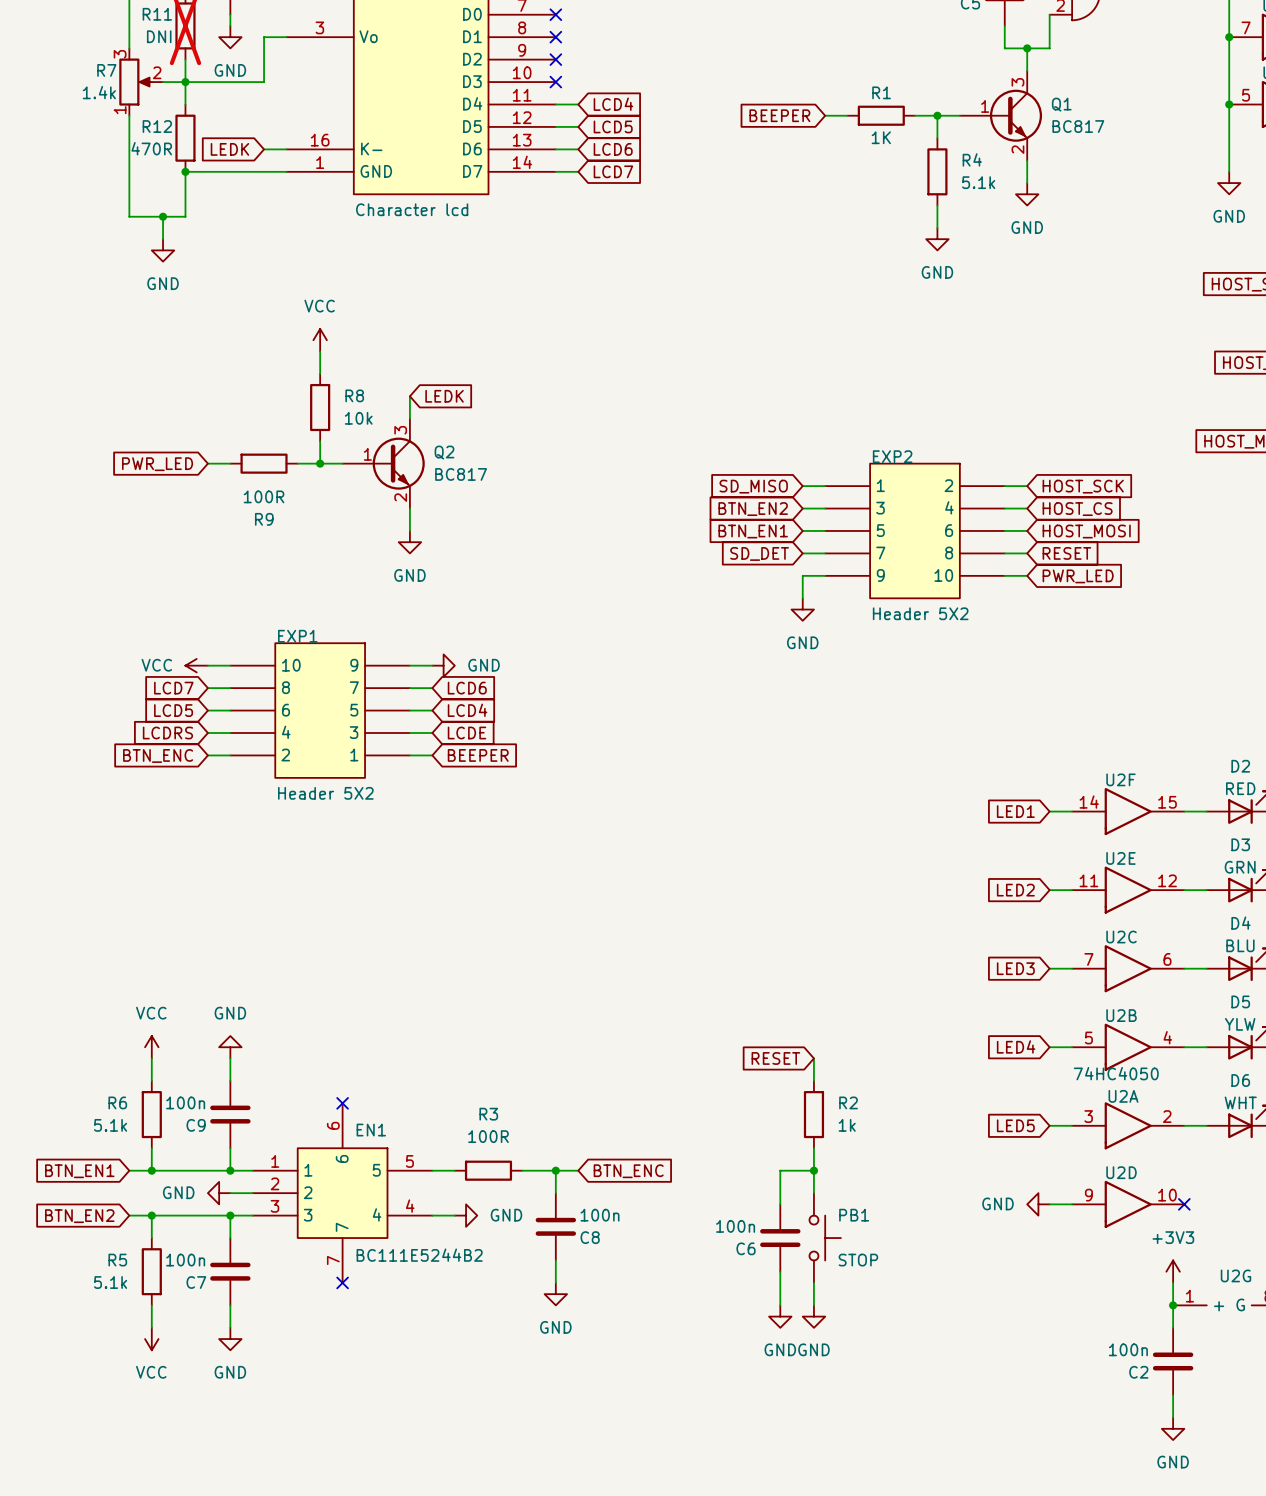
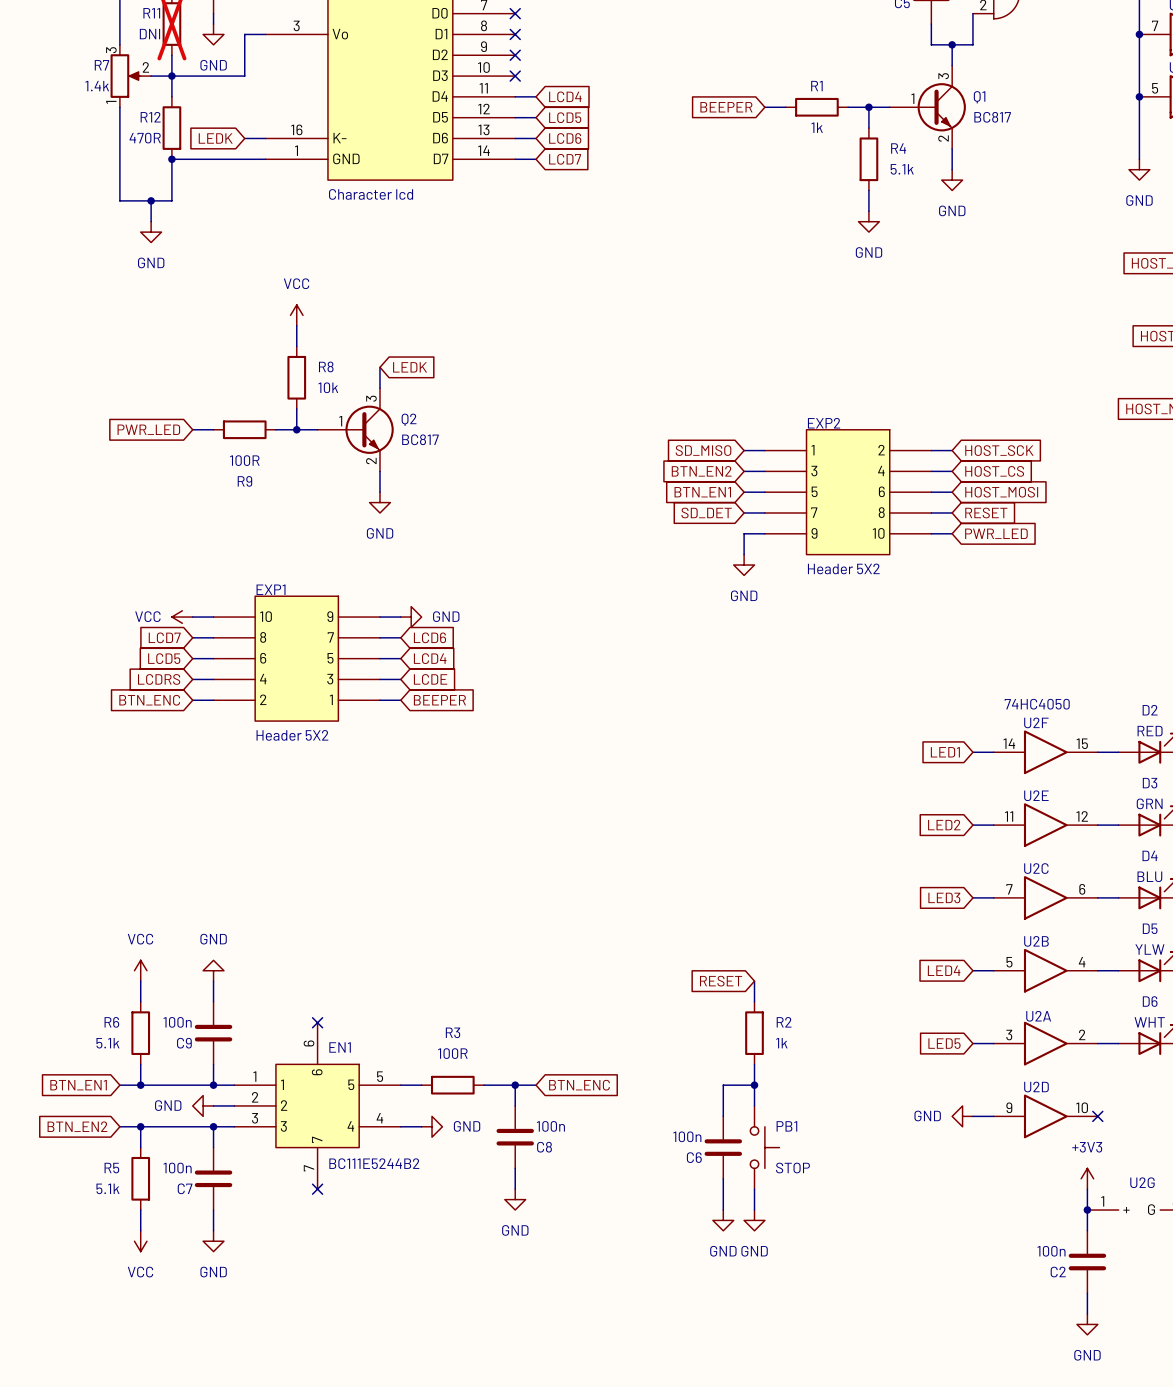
R1 value: 1K (881, 137) -> 1k (817, 127)
U2A value position: 74HC4050 (1116, 1073) -> 74HC4050 (1037, 704)

